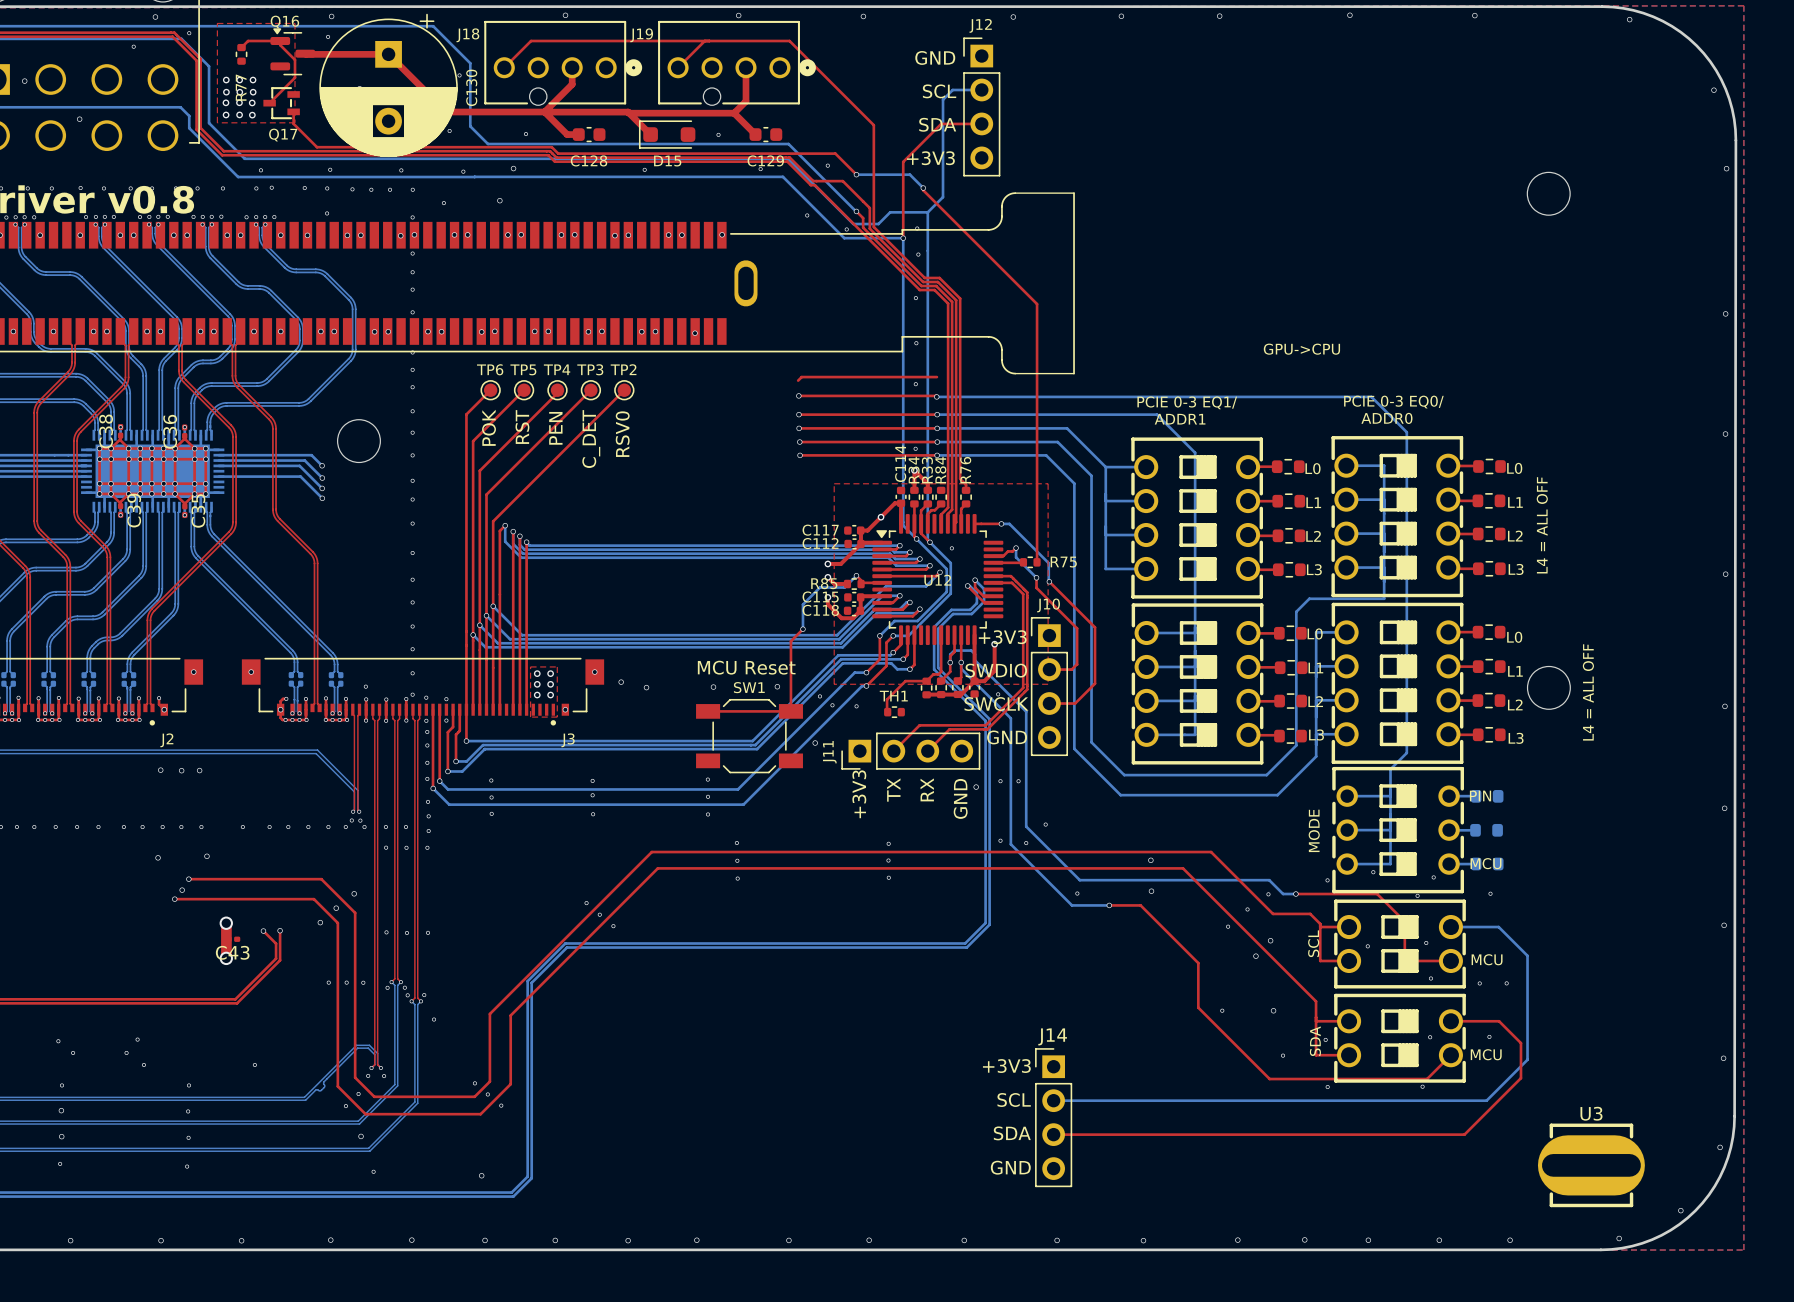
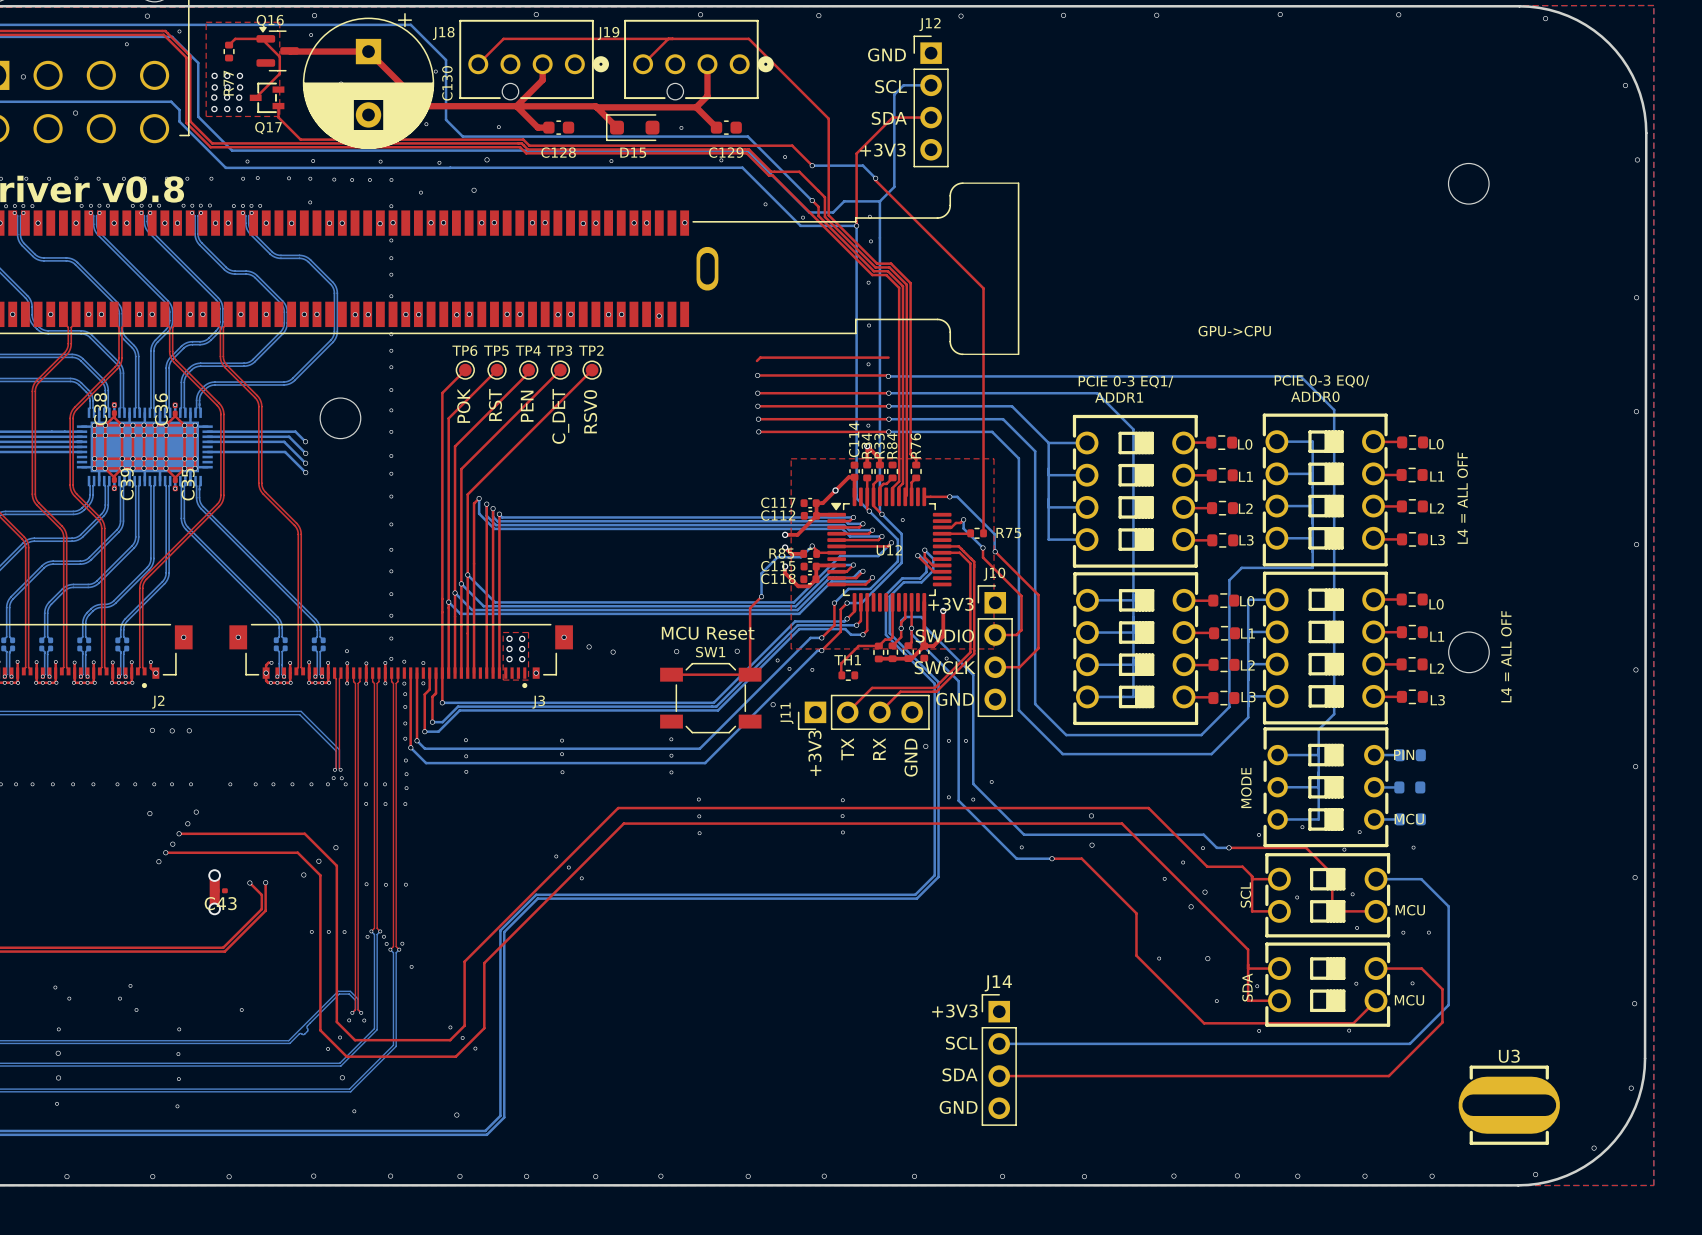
via: none -> (187, 823)
via: none -> (158, 861)

